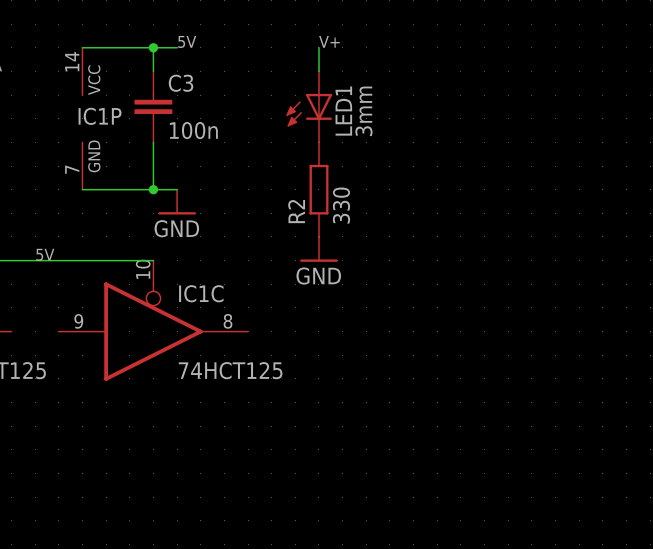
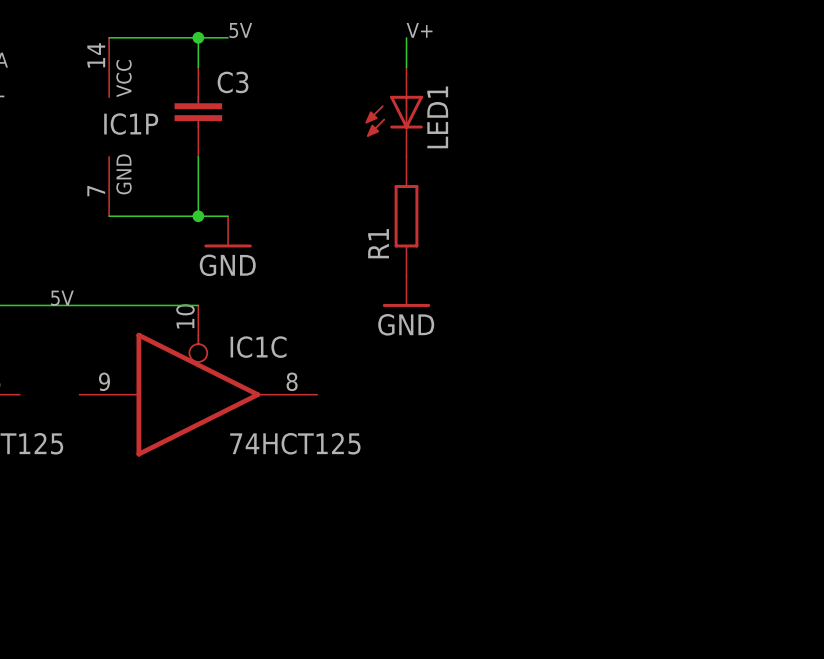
LED1 value: 3mm (363, 111) -> none
C3 value: 100n (193, 130) -> none
R2 value: 330 (341, 205) -> none
R2 name: R2 (296, 211) -> R1 (378, 243)

